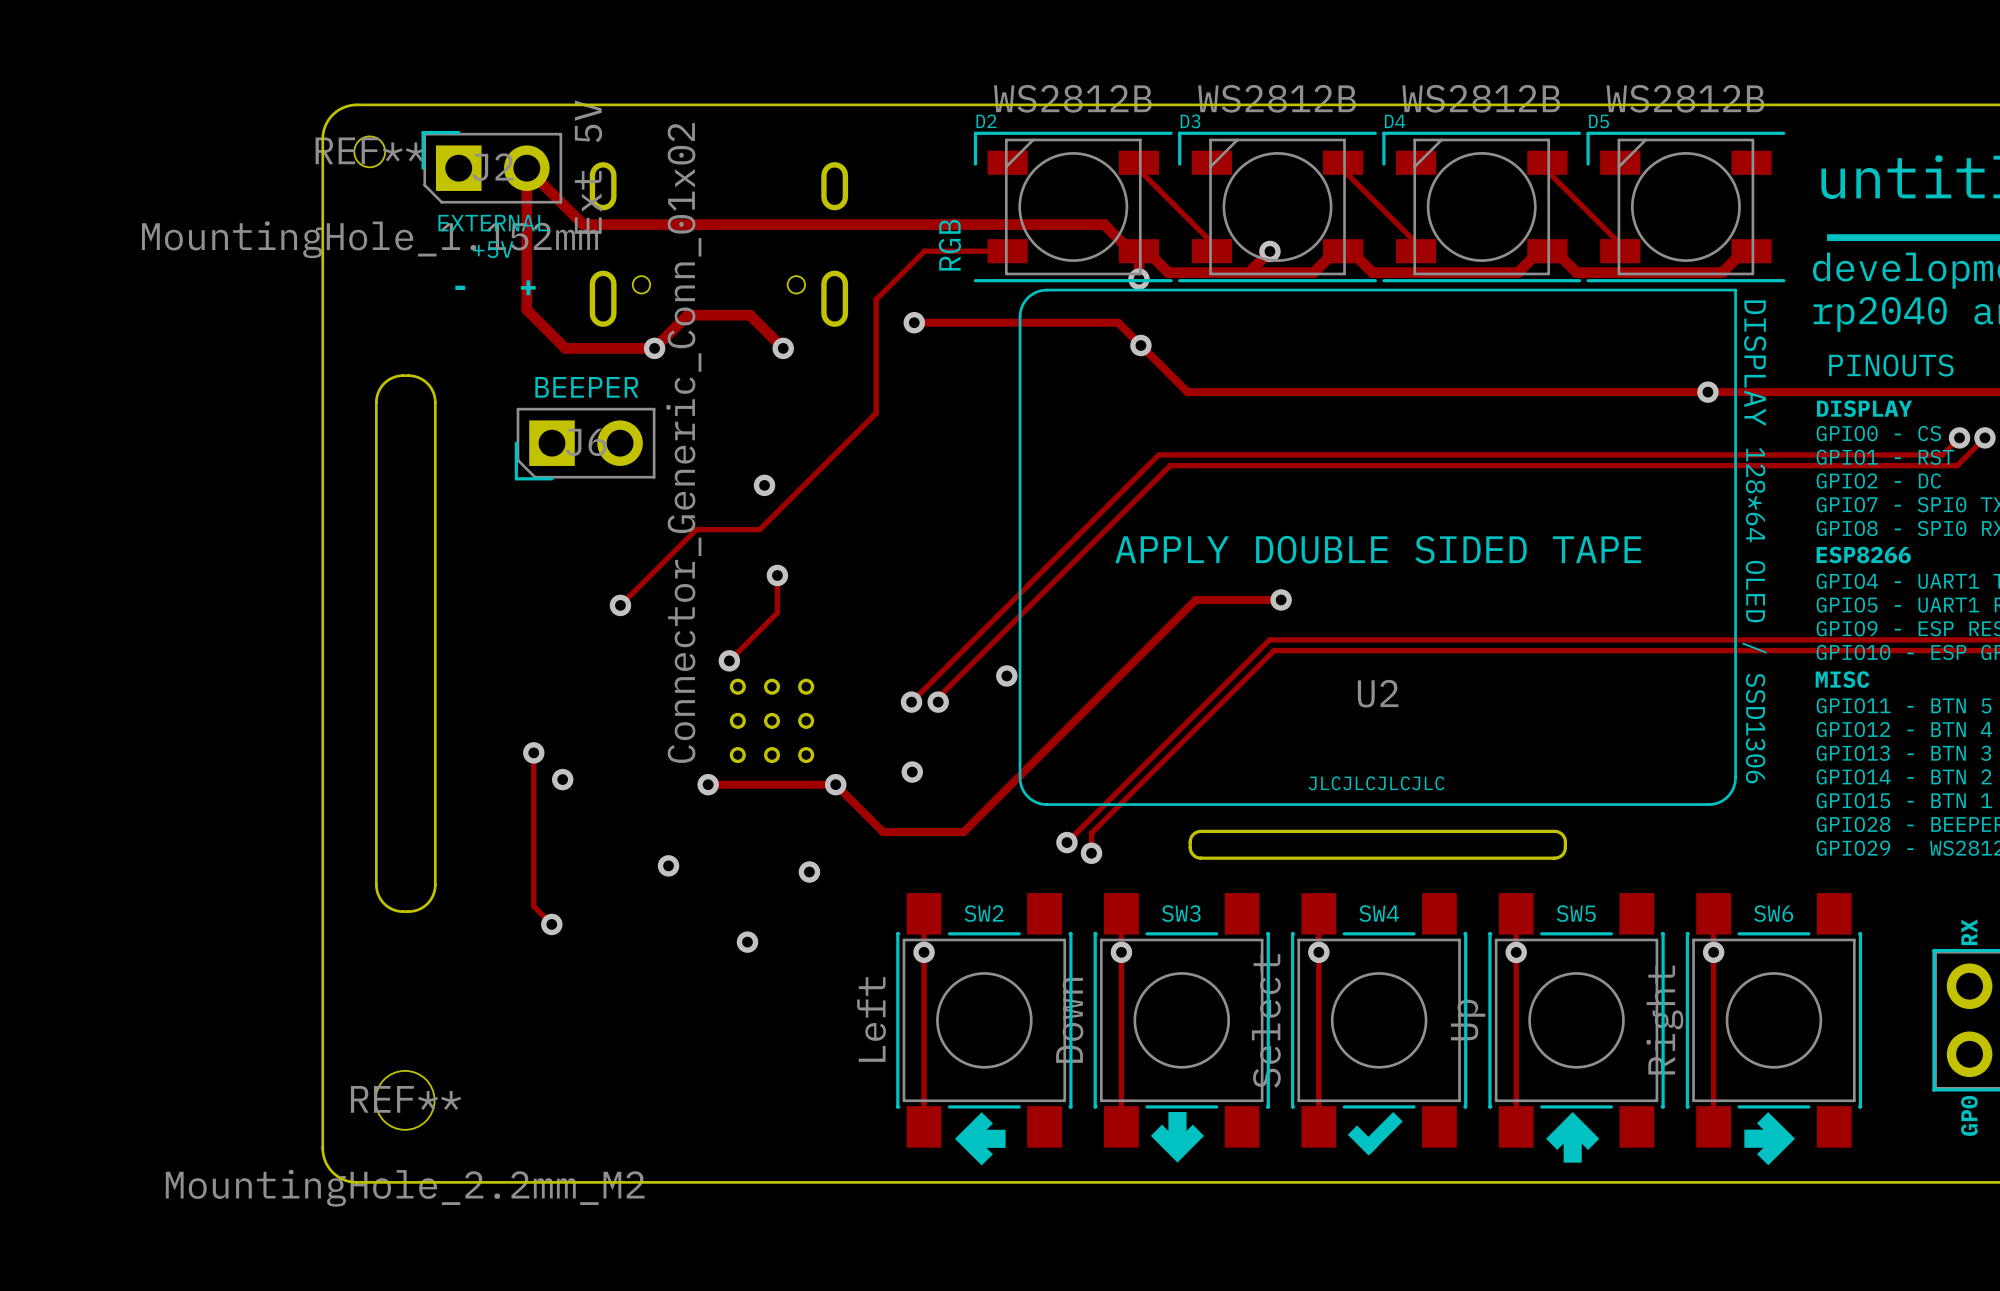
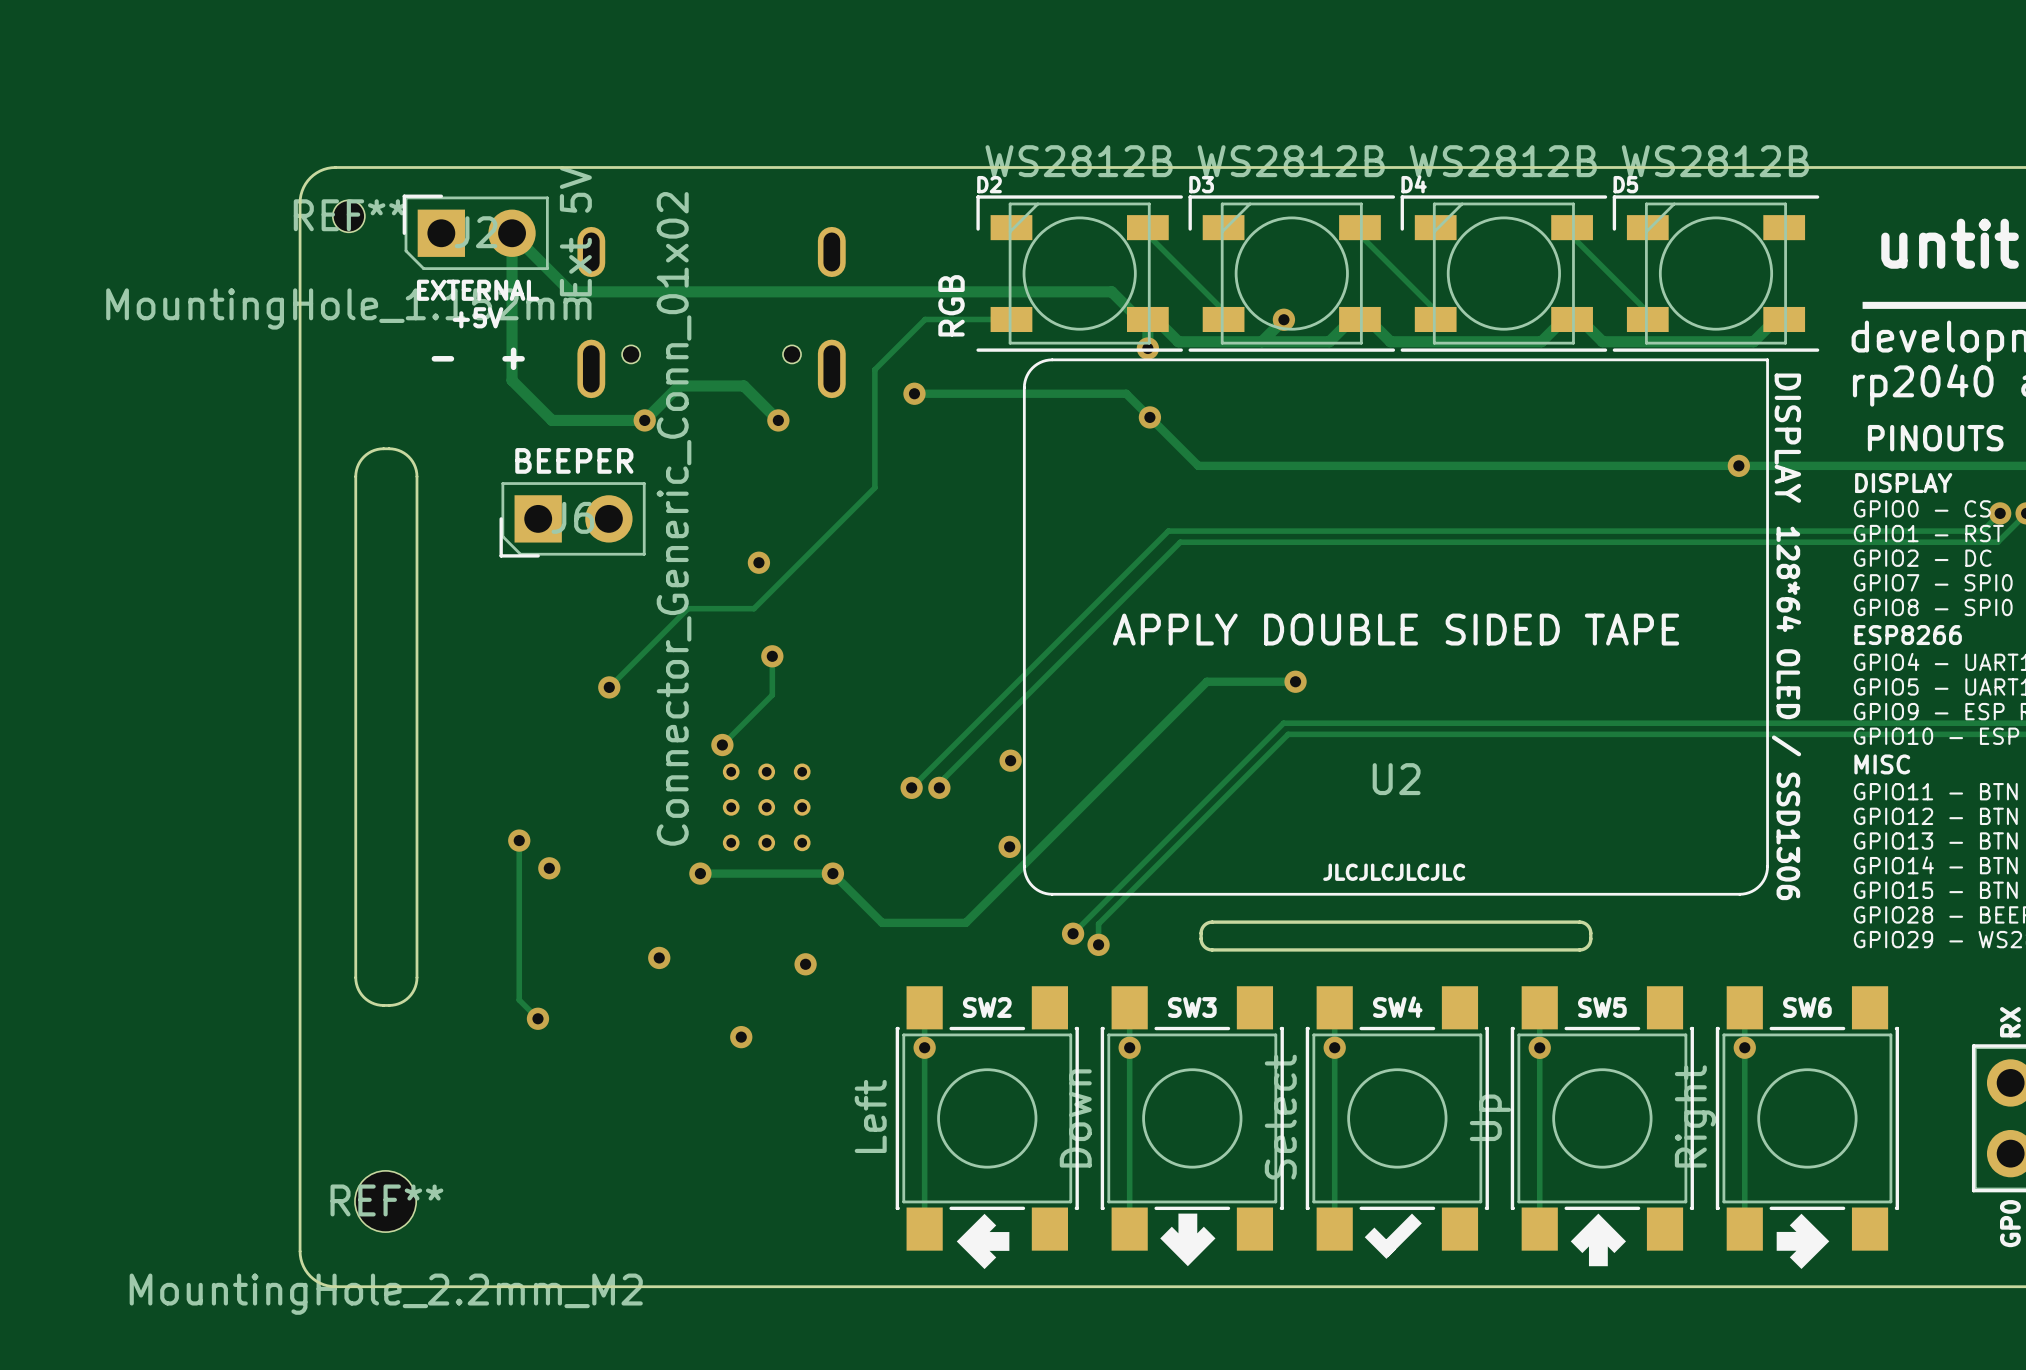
via position: (912, 772) -> (1009, 846)

